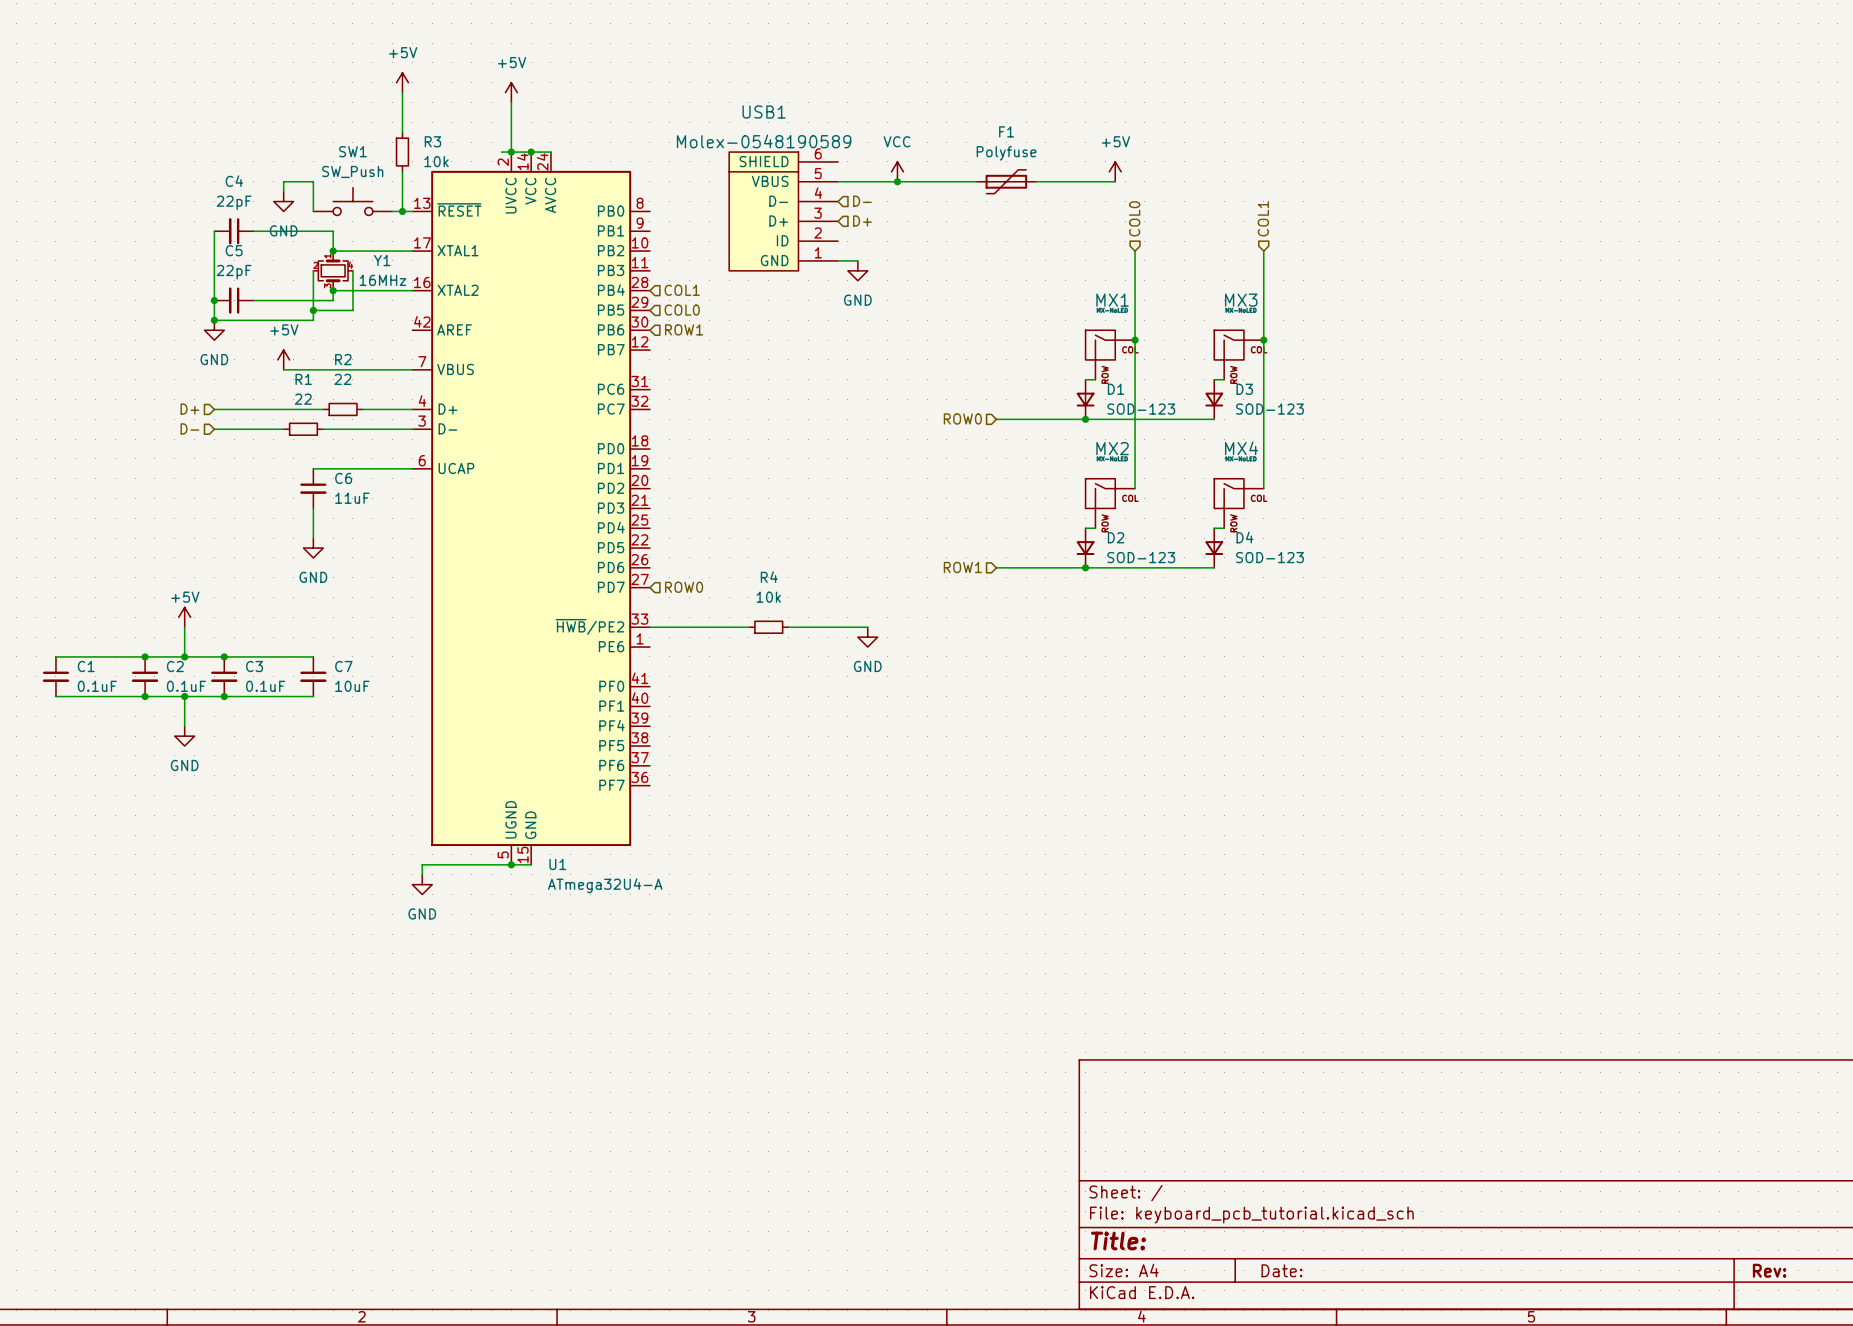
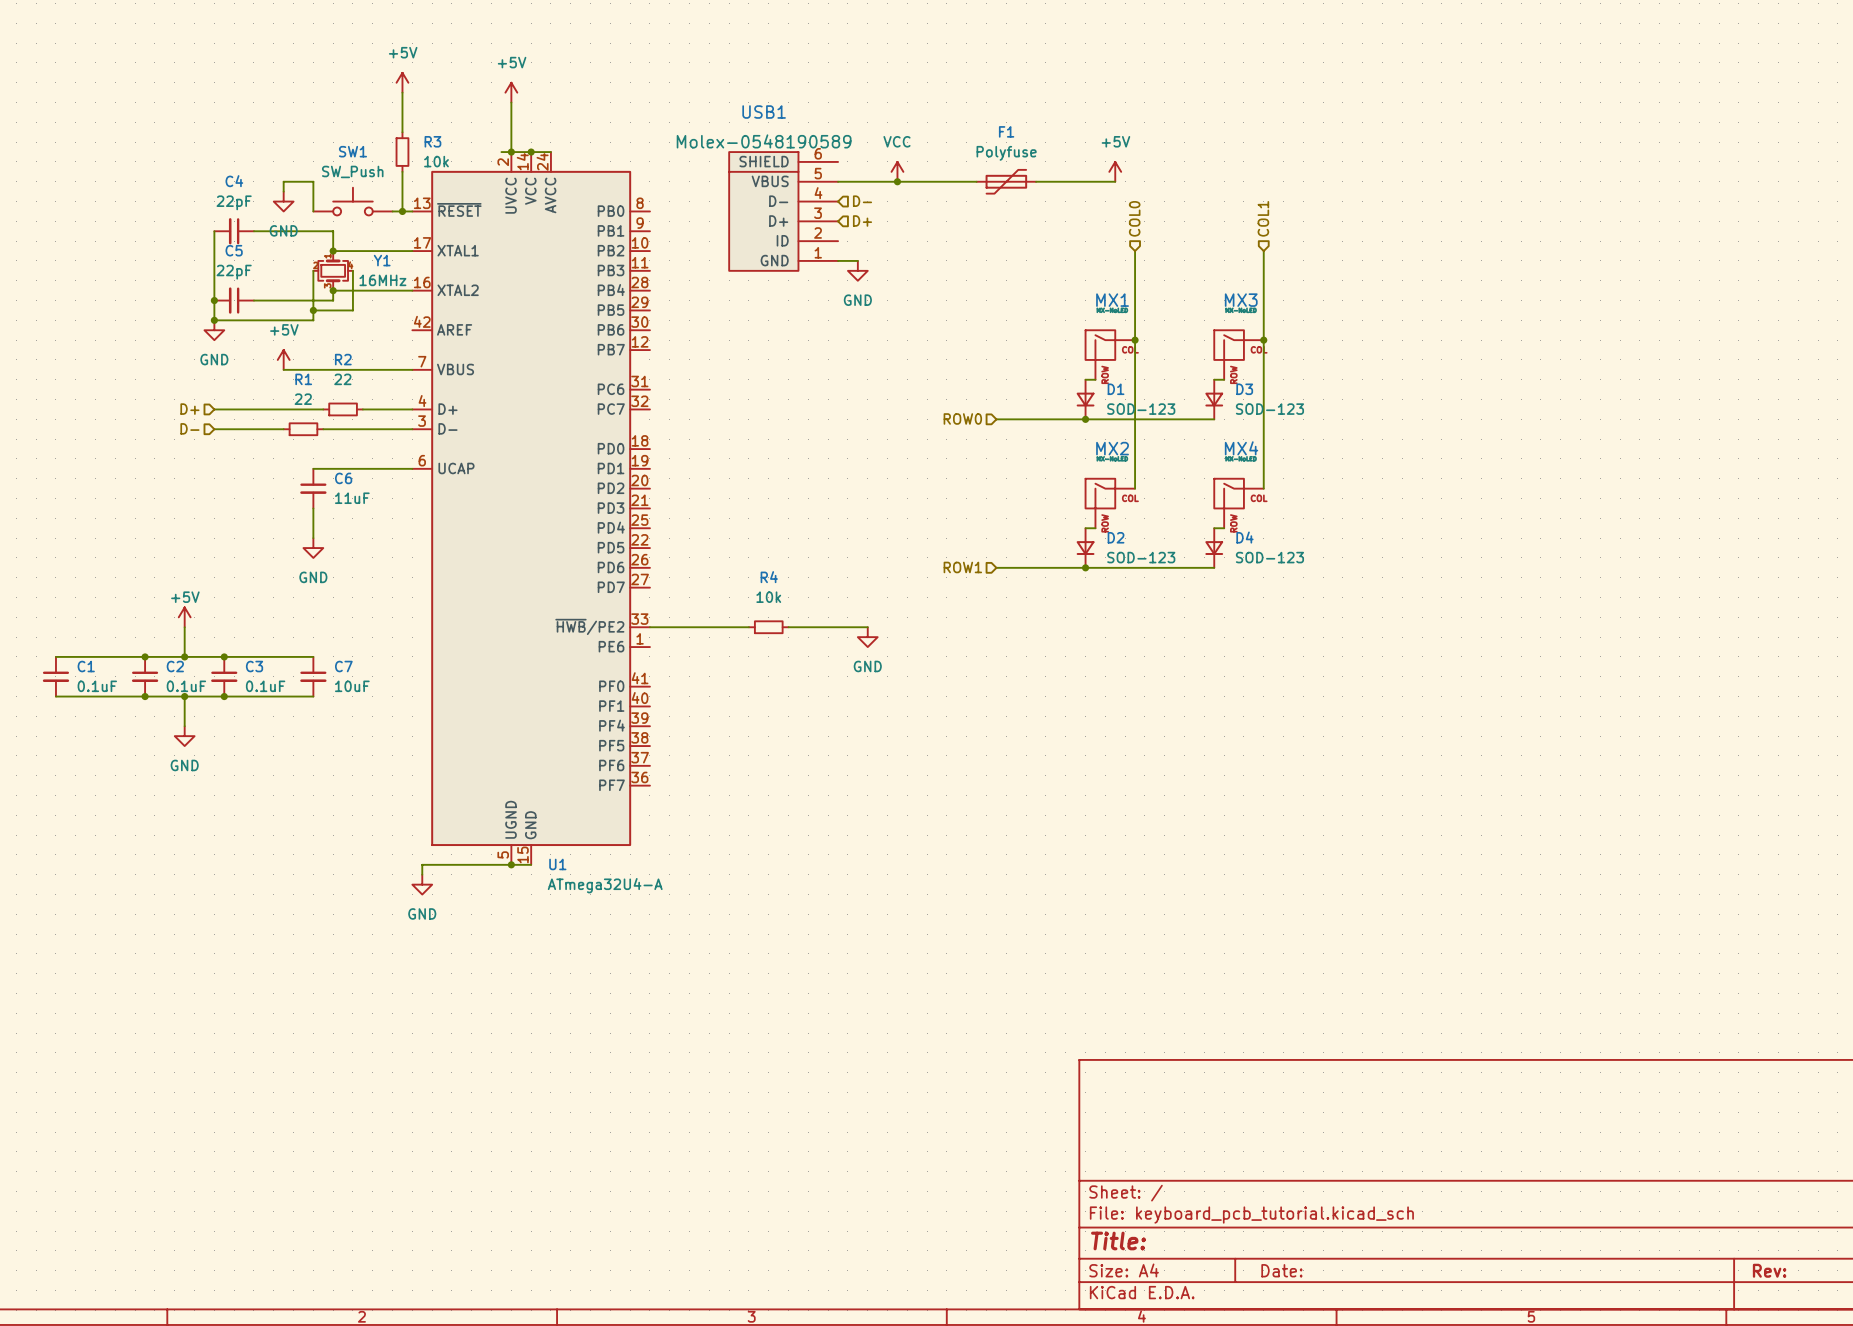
hierarchical label: COL1 (682, 290) -> none
hierarchical label: COL0 (682, 310) -> none
hierarchical label: ROW1 (684, 329) -> none
hierarchical label: ROW0 (684, 587) -> none

